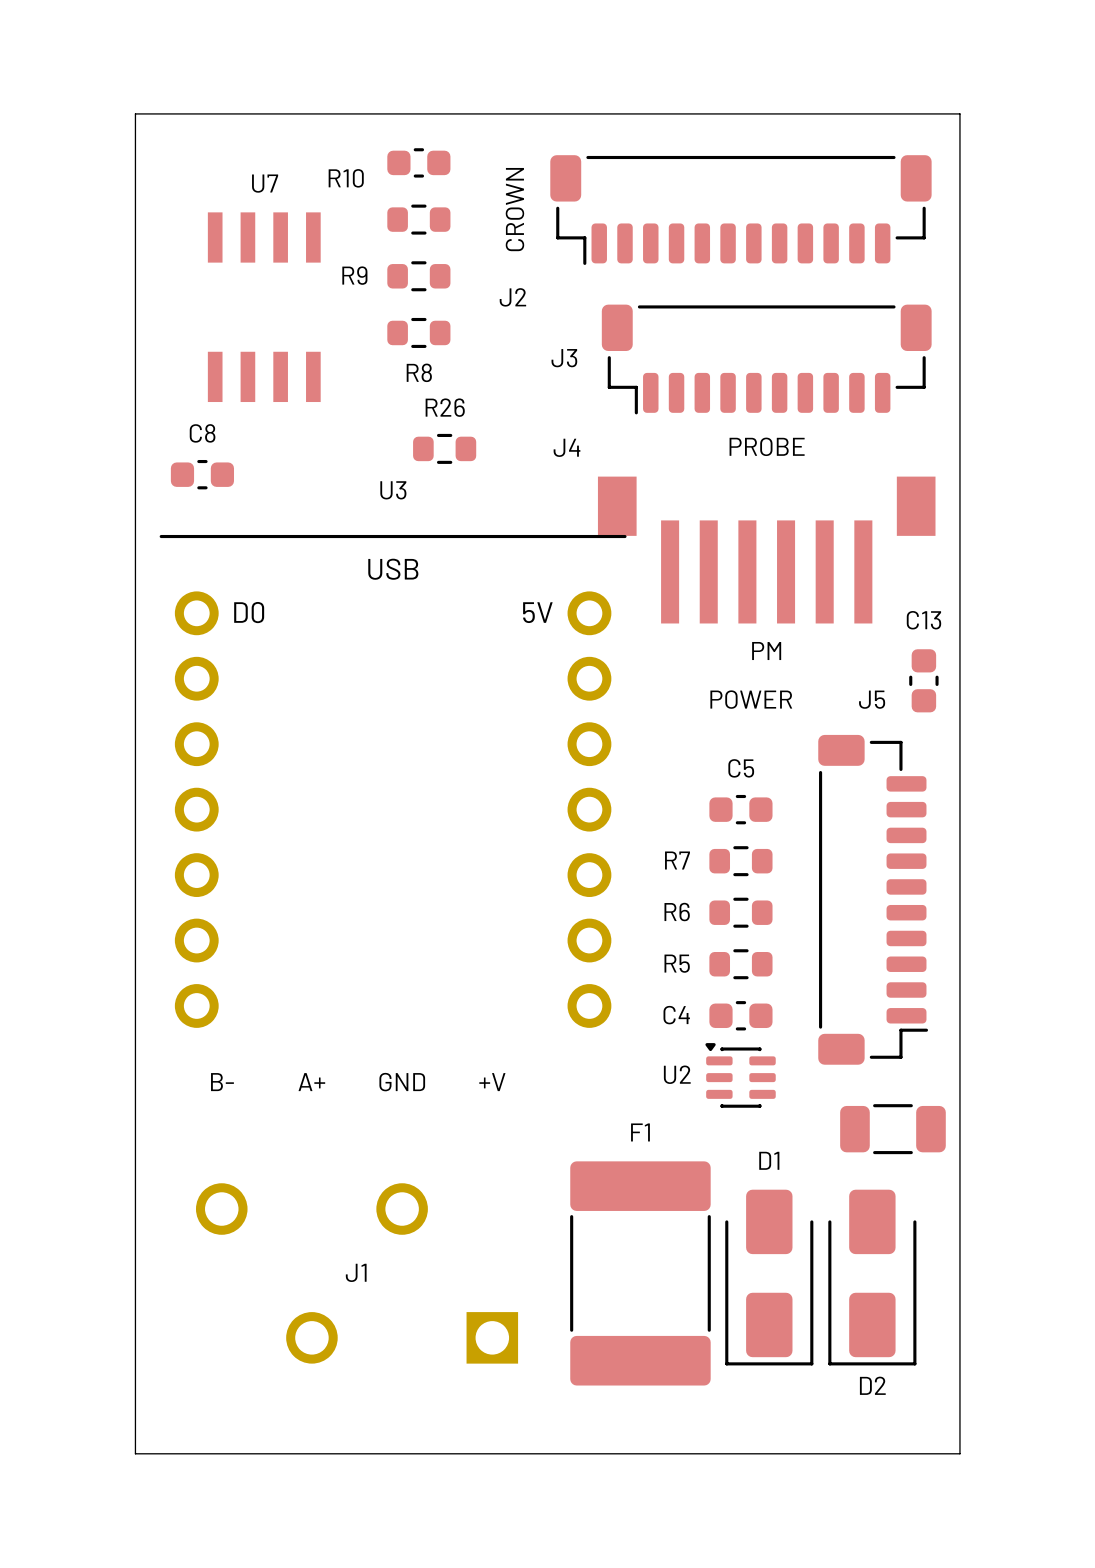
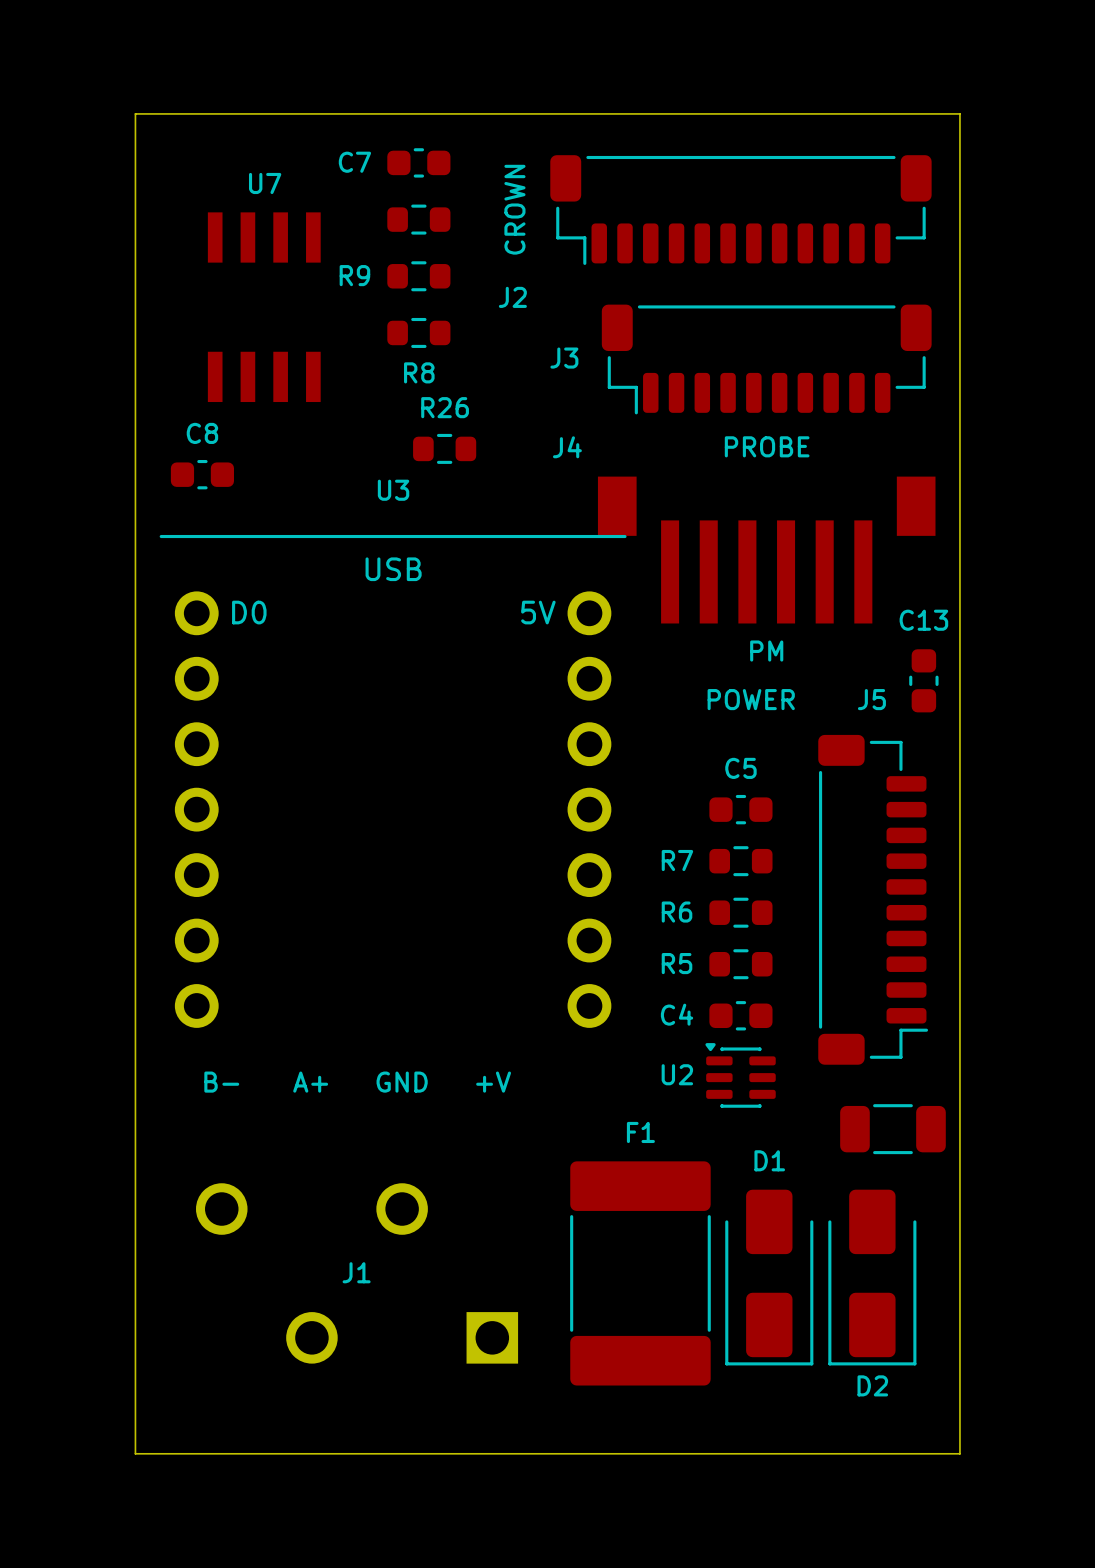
C7 name: none -> C7 (354, 162)
R10 name: R10 (346, 178) -> none

